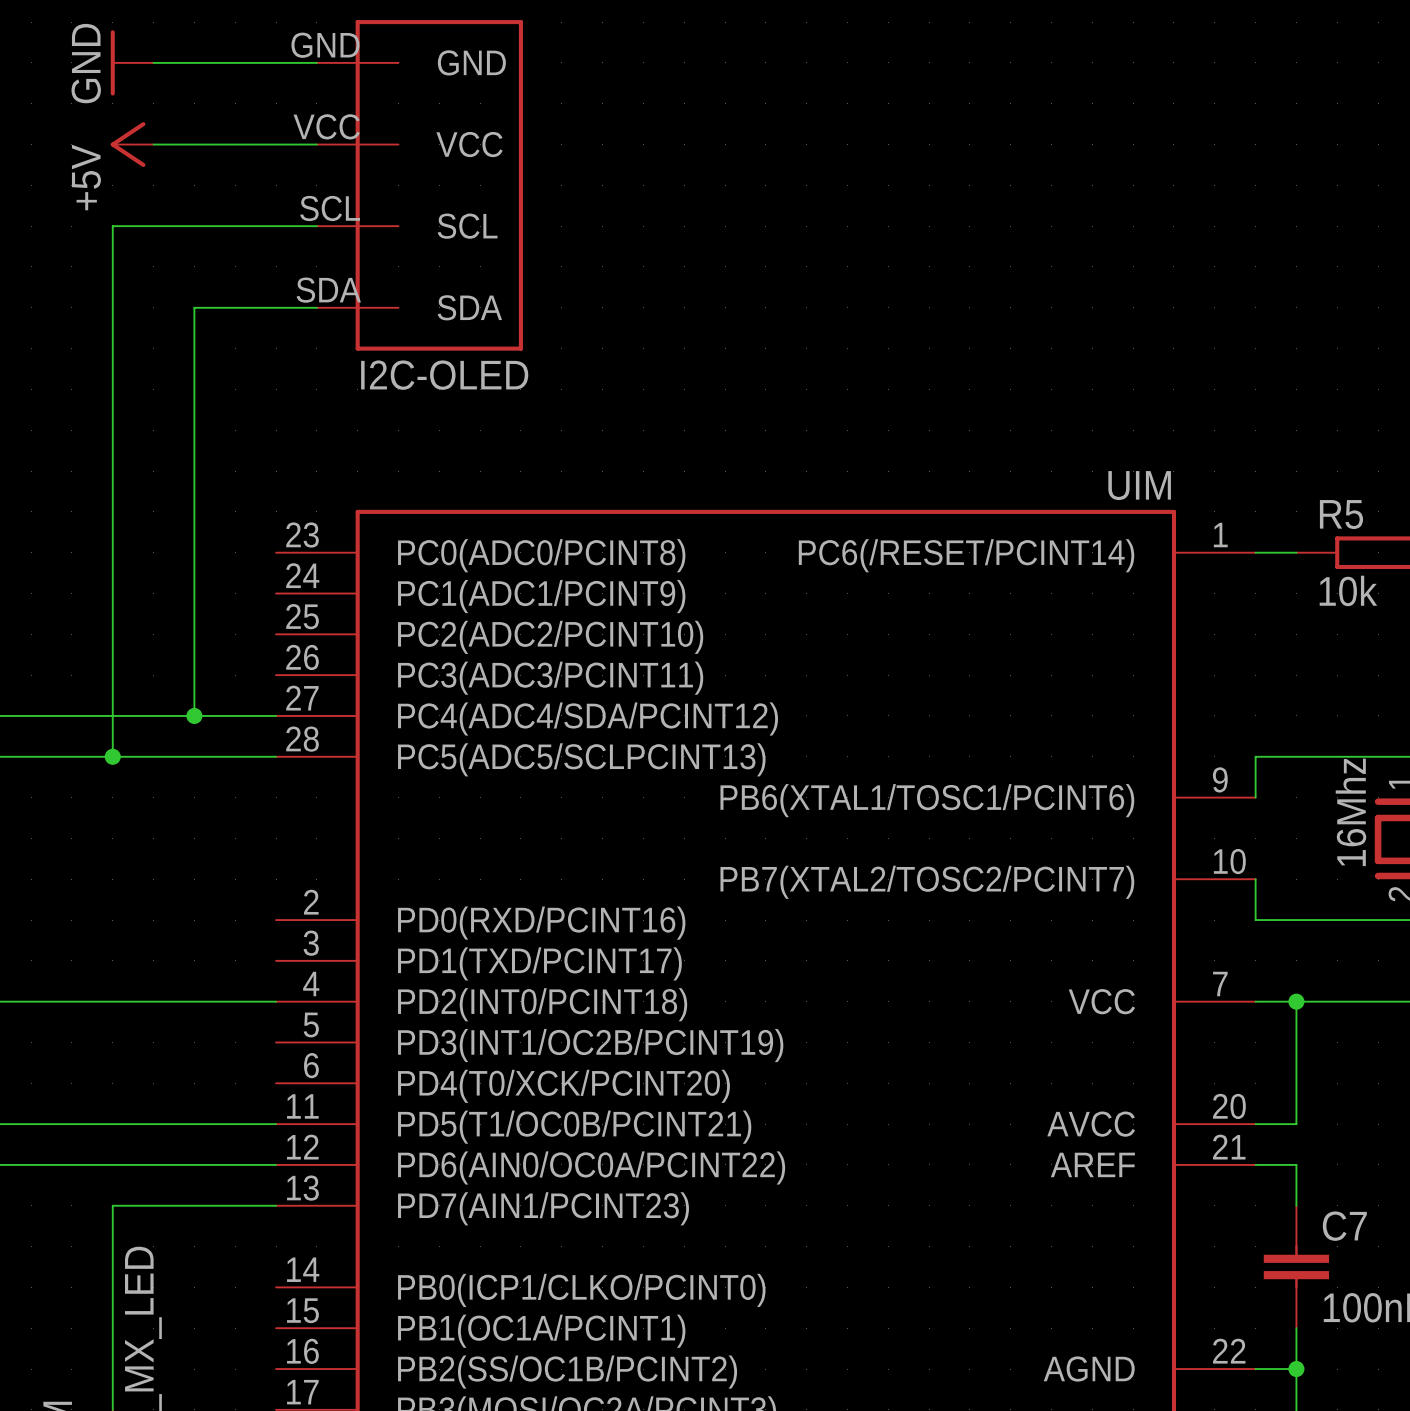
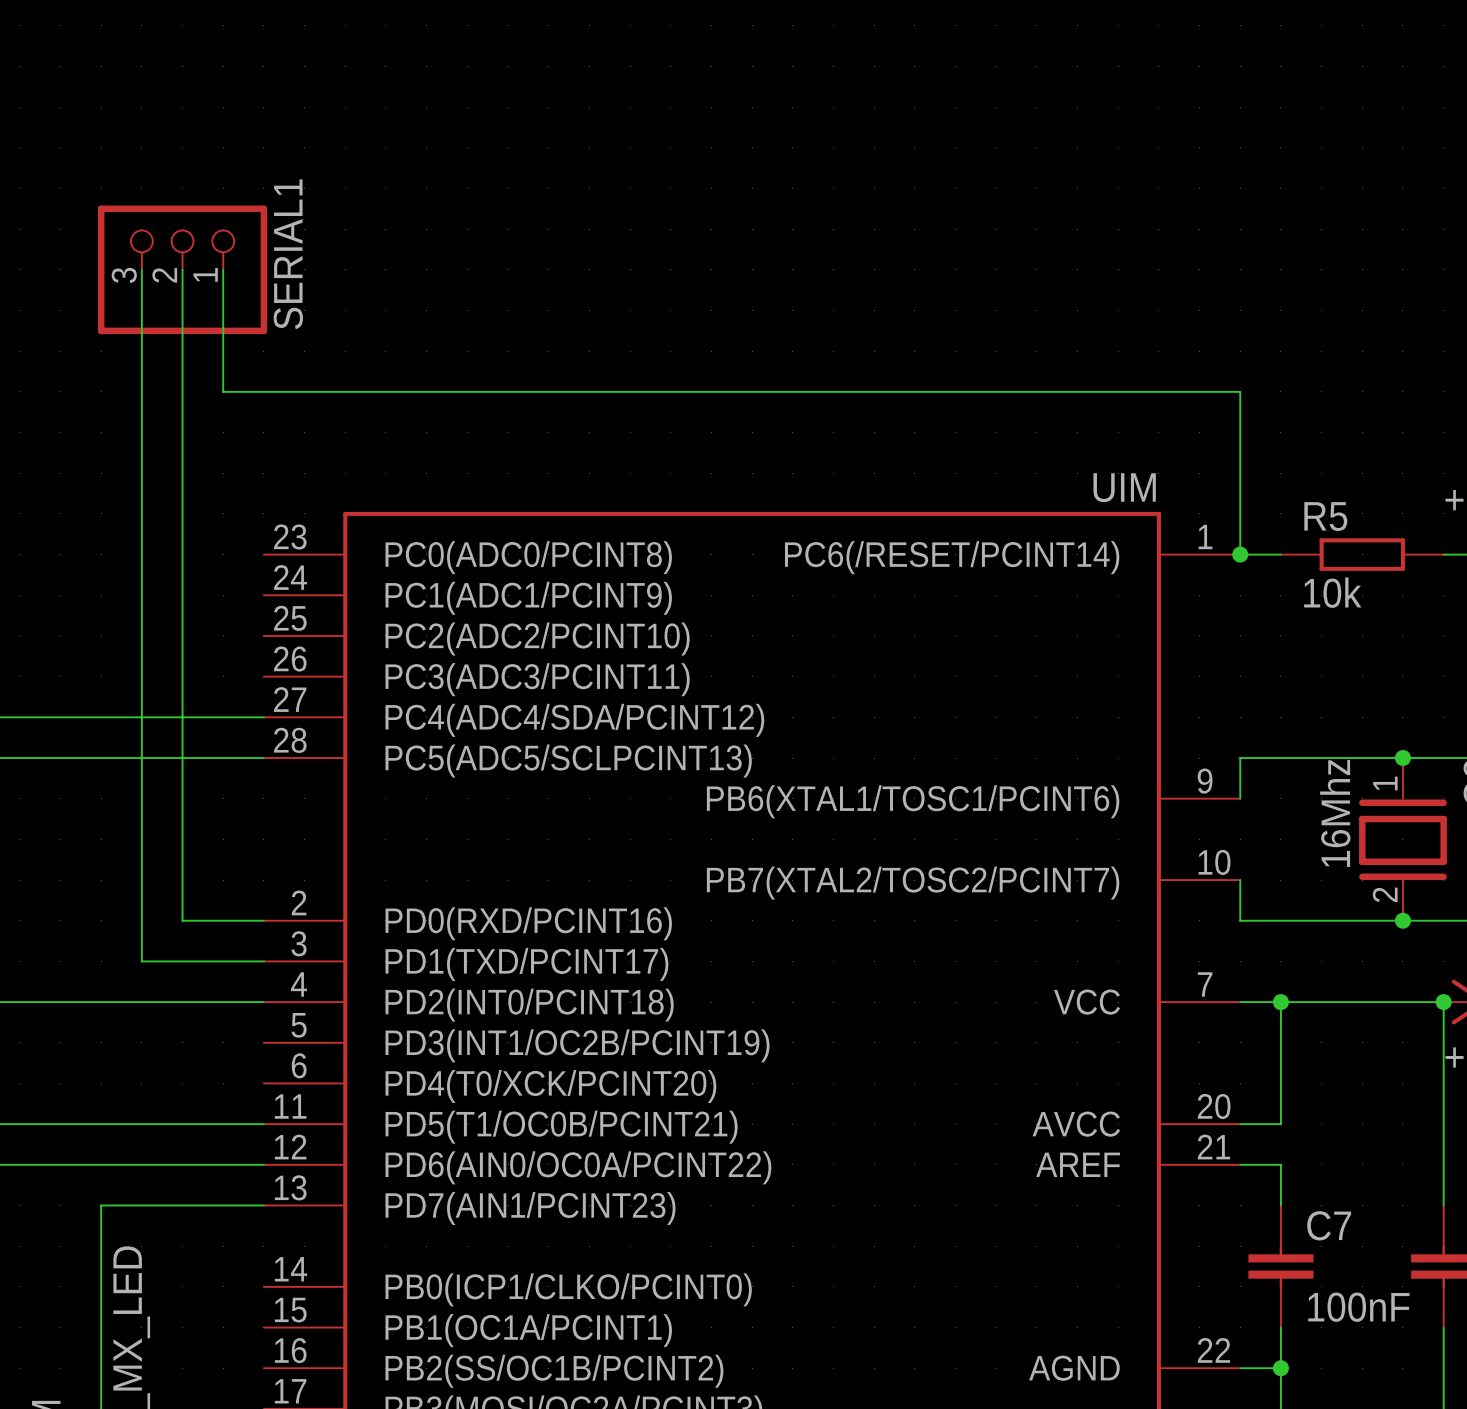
power symbol: GND (132, 62) -> none
wire: (153, 62) (316, 62) -> none
power symbol: +5V (132, 144) -> none
wire: (153, 144) (316, 144) -> none
part: (419, 185) -> none
wire: (316, 226) (112, 226) (112, 756) -> none
wire: none -> (141, 269) (141, 961) (263, 961)
SERIAL1: none -> (182, 269)
wire: none -> (223, 269) (223, 391) (1240, 391) (1240, 554)
wire: (194, 307) (316, 307) -> (182, 310) (182, 269)
text: I2C-OLED (444, 375) -> none
junction: none -> (1240, 554)
wire: none -> (182, 717) (182, 920) (263, 920)
junction: (194, 715) -> none
junction: (112, 756) -> none

